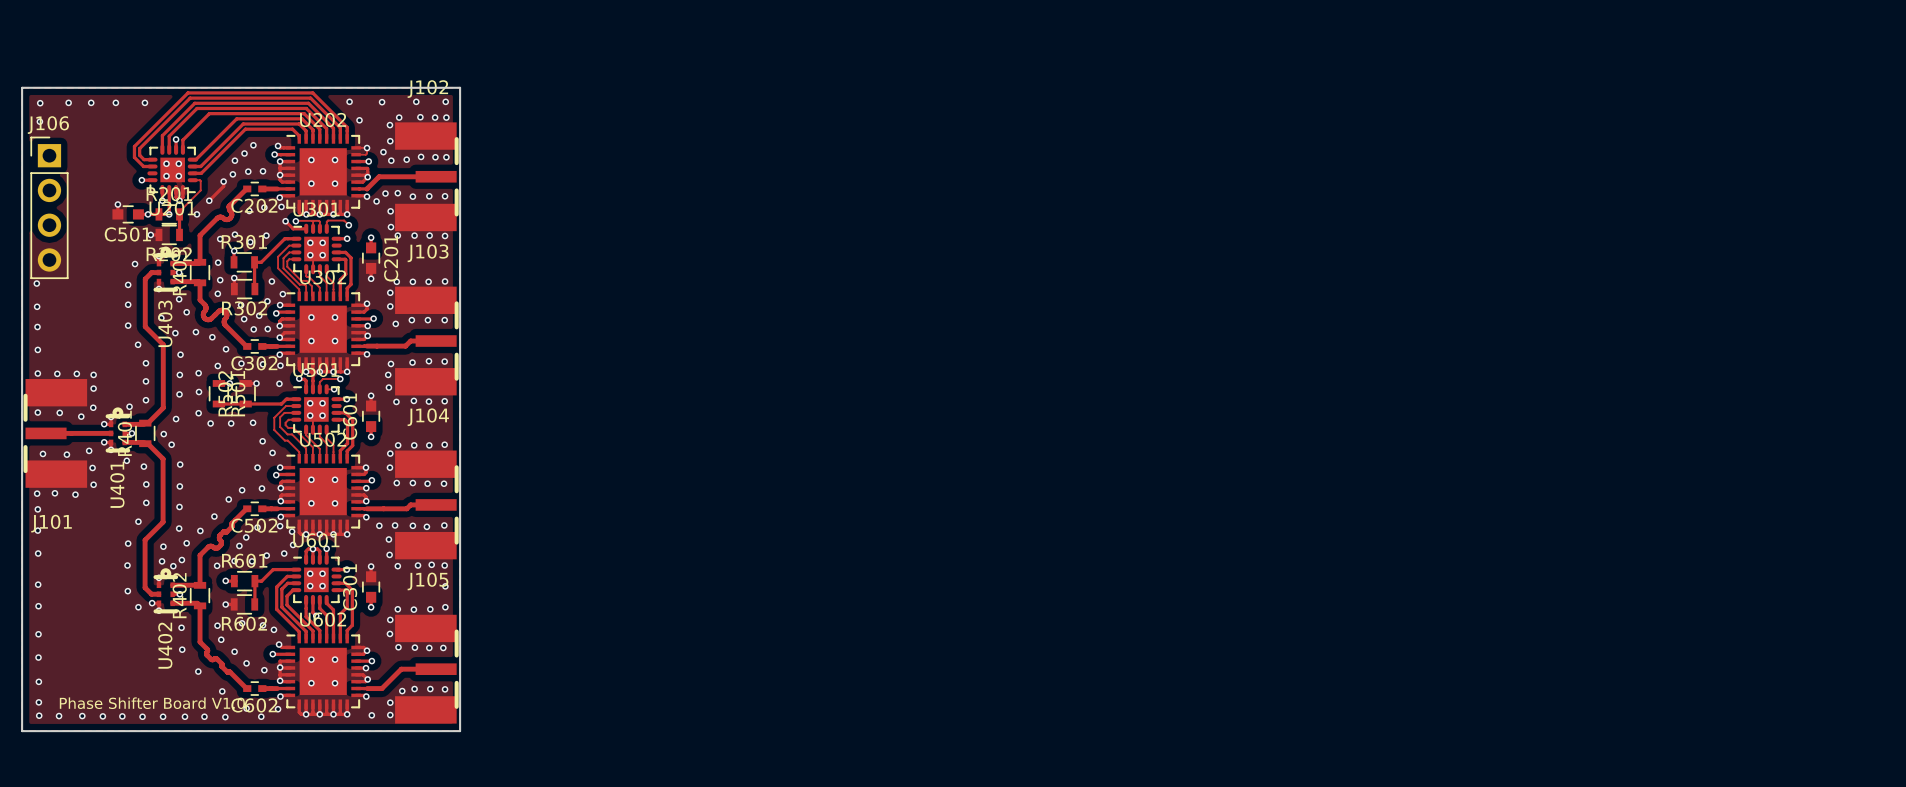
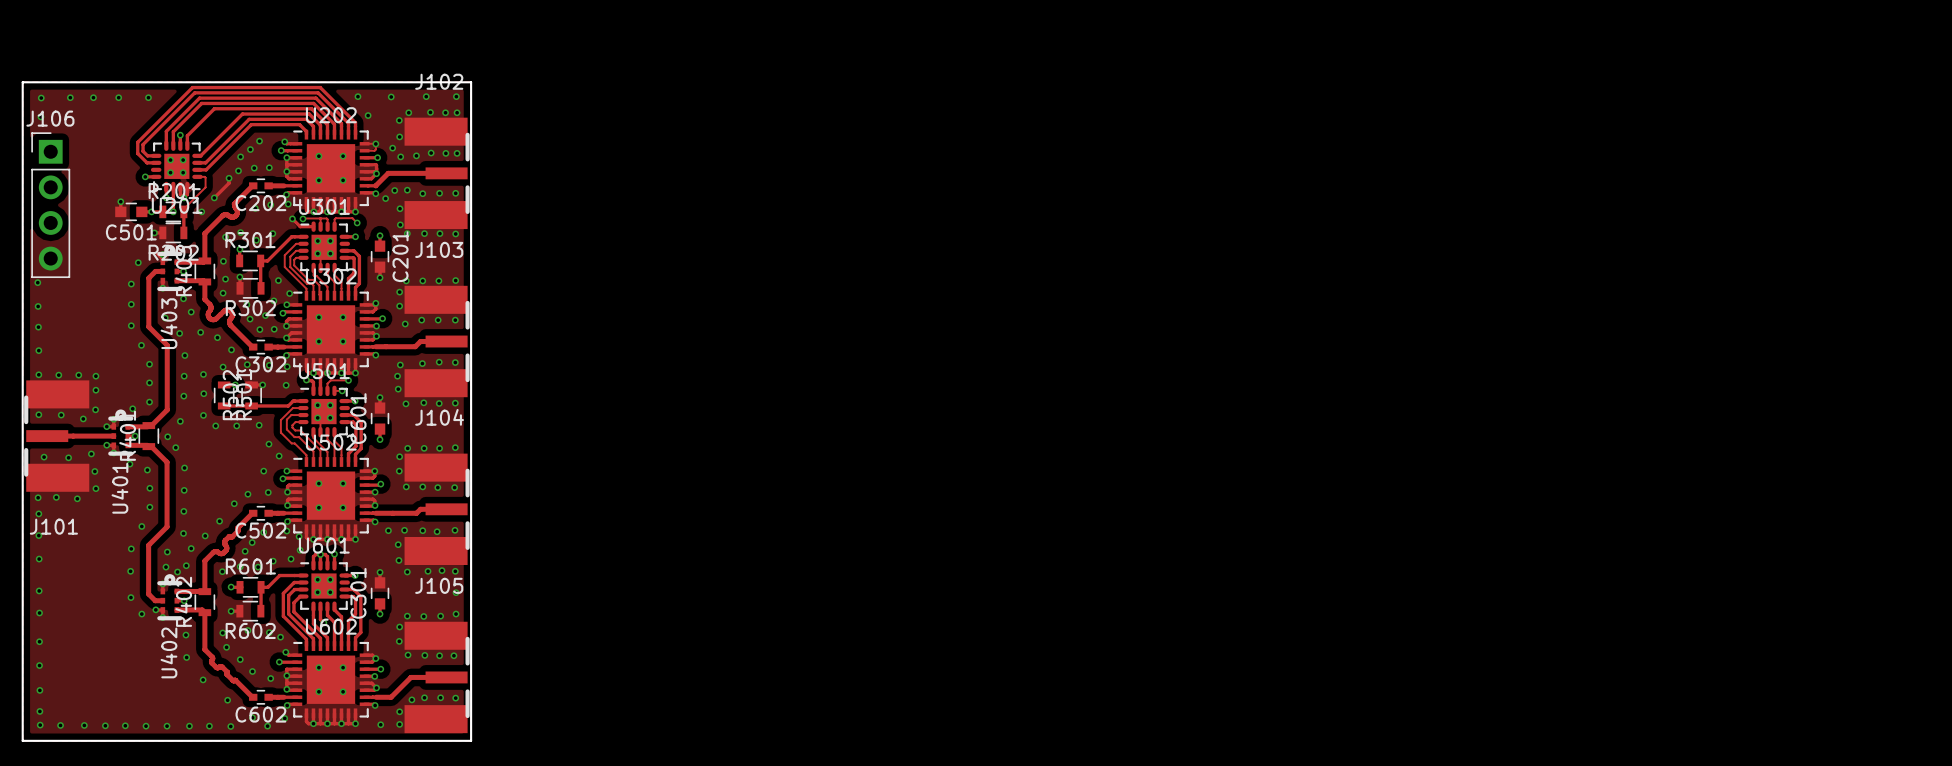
text: Phase Shifter Board V1.0 (152, 703) -> none

